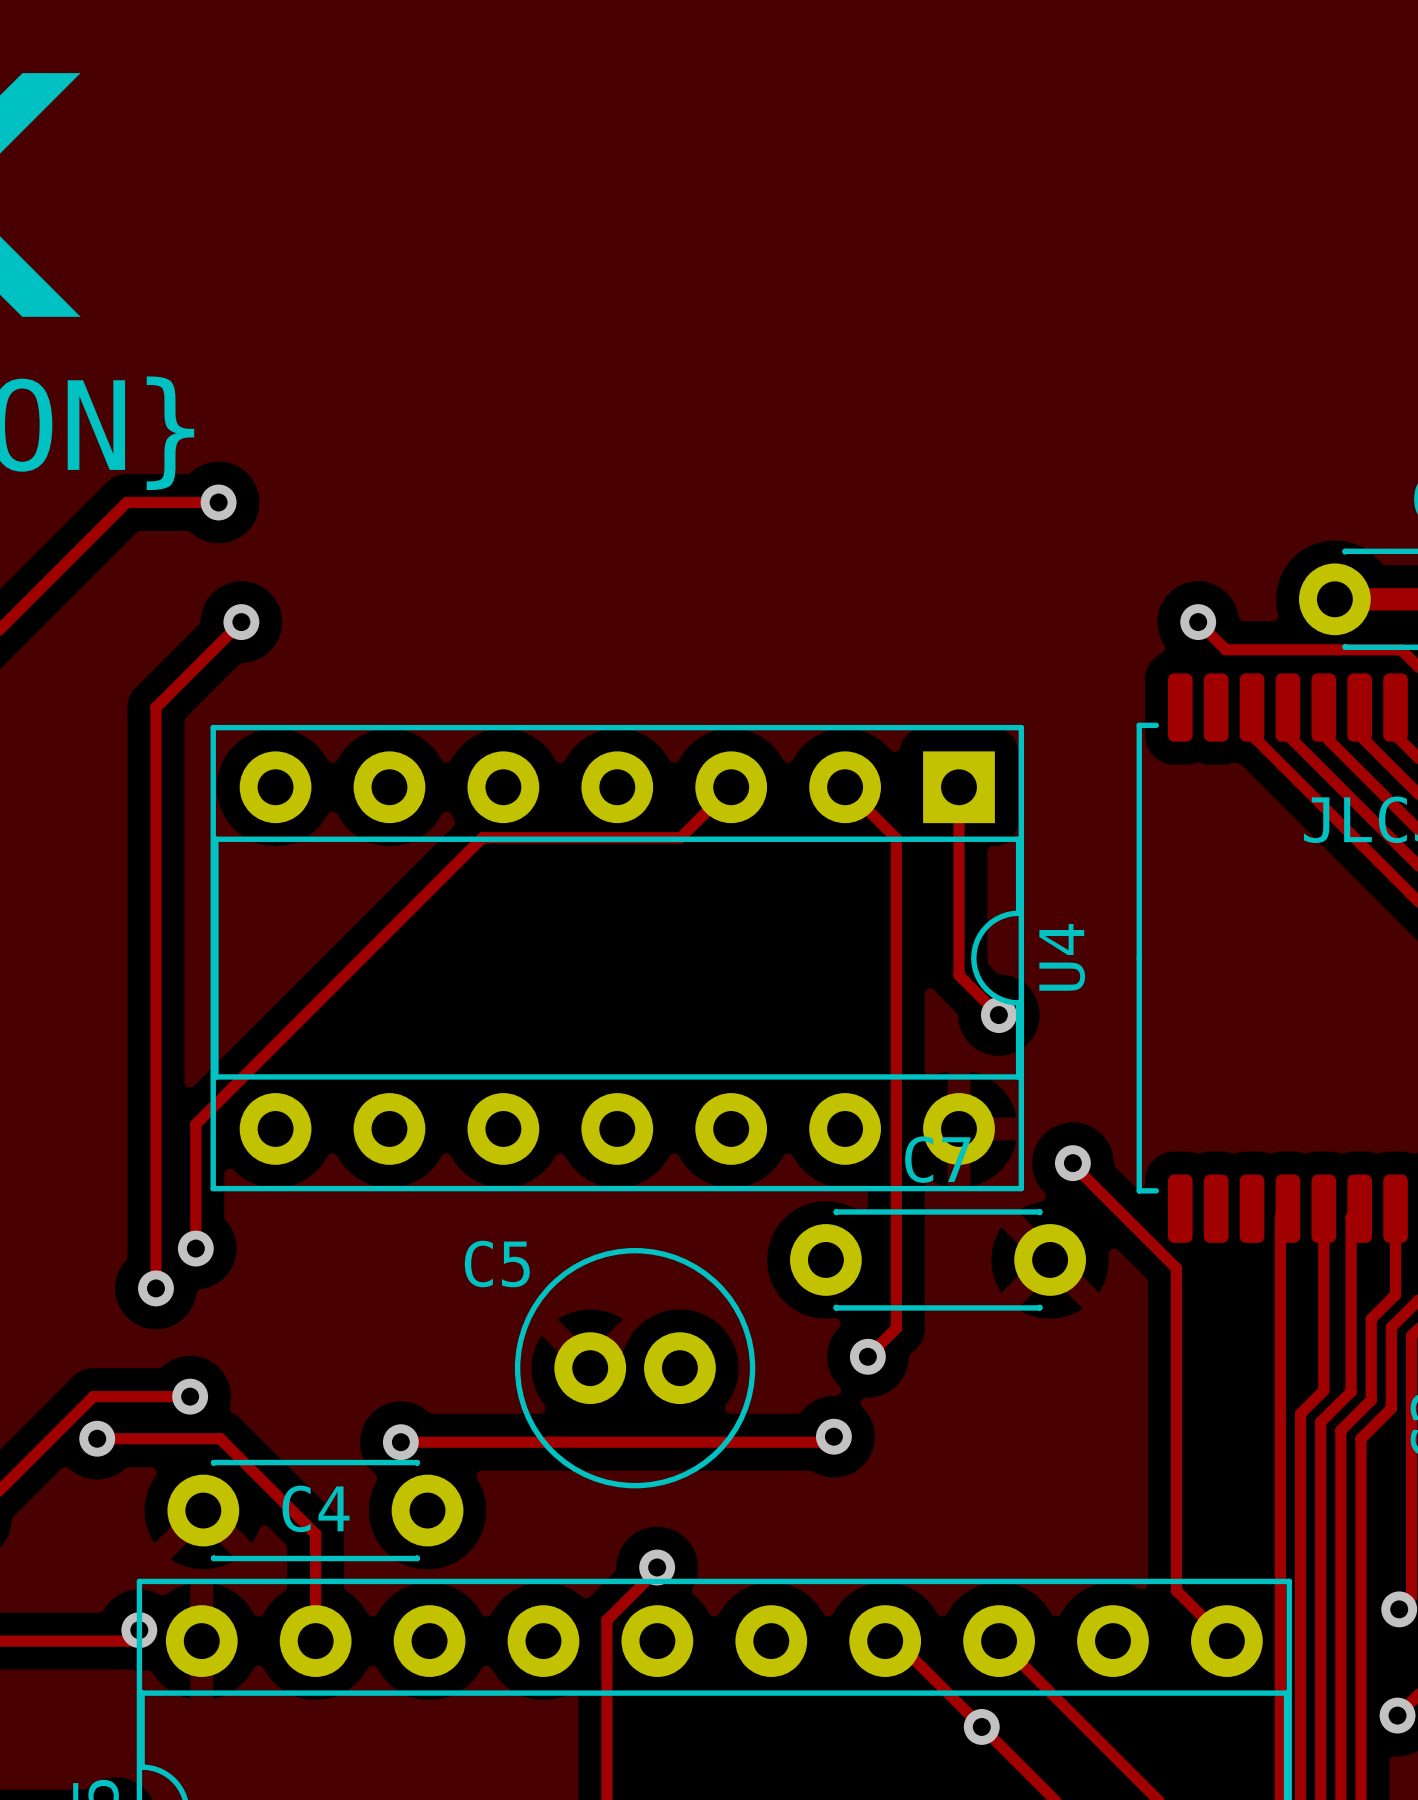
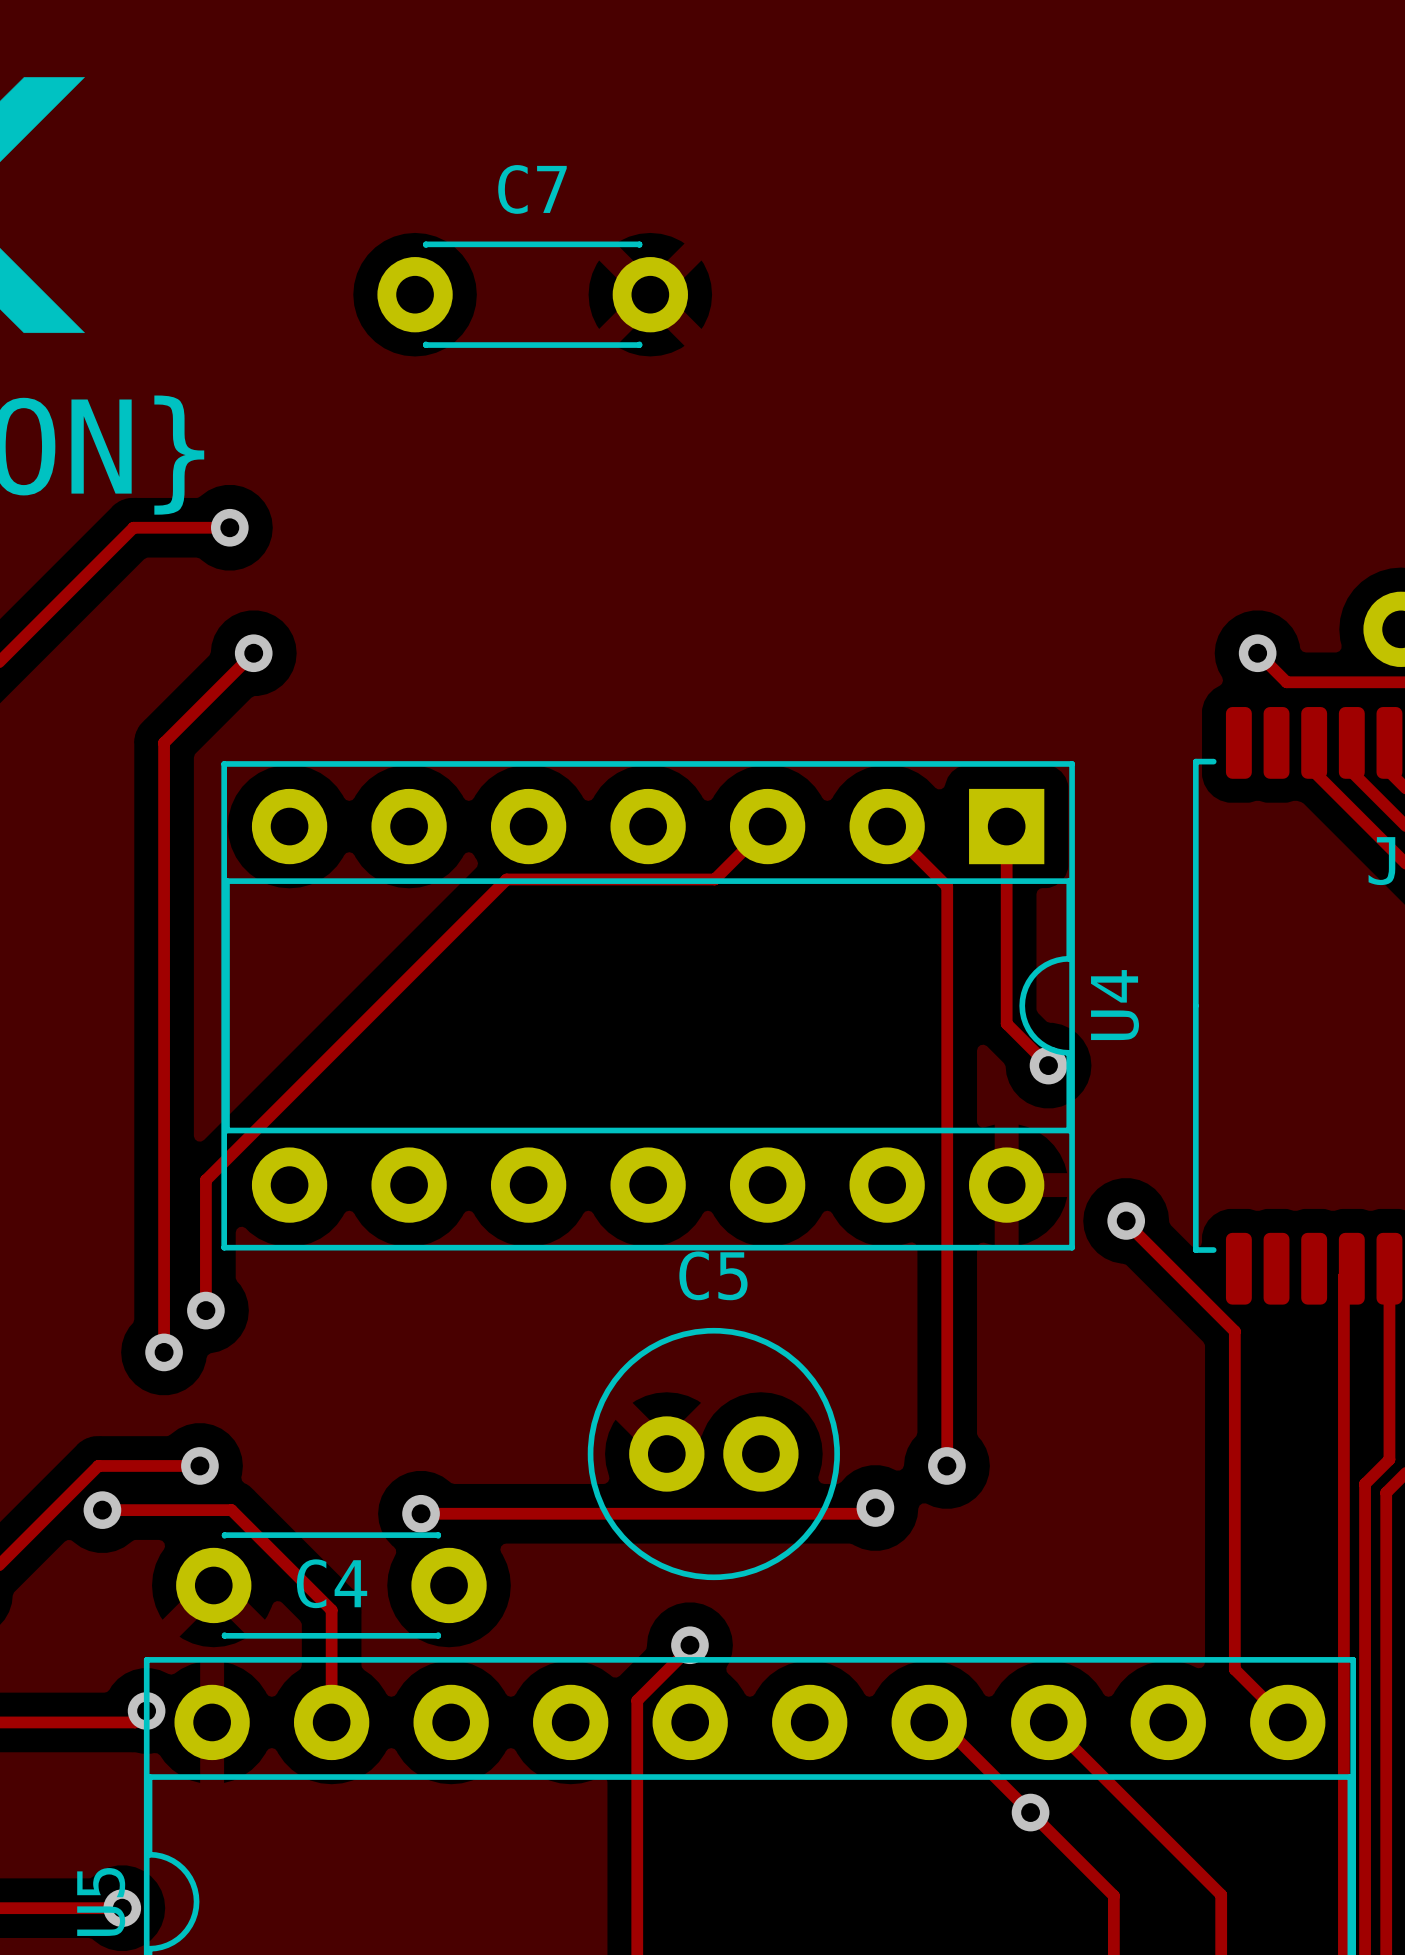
track: (896, 838) (896, 1328) (867, 1356) -> (940, 880) (947, 886) (947, 1465)
C7 position: (938, 1259) -> (532, 294)
C5 name position: C5 (497, 1264) -> C5 (713, 1275)
via position: (867, 1356) -> (946, 1465)
C5 position: (635, 1368) -> (713, 1454)

